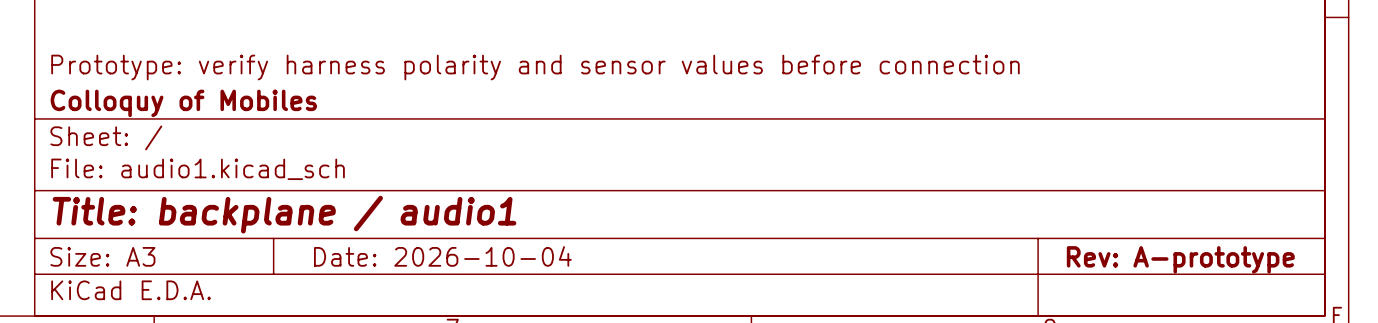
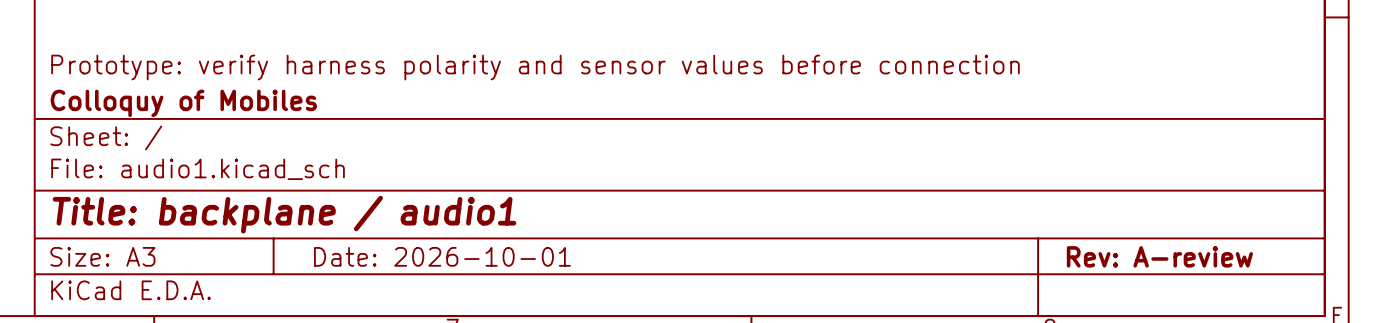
title block: Date: 2026-10-04 (442, 256) -> Date: 2026-10-01 (442, 256)
title block: Rev: A-prototype (1180, 259) -> Rev: A-review (1159, 256)

